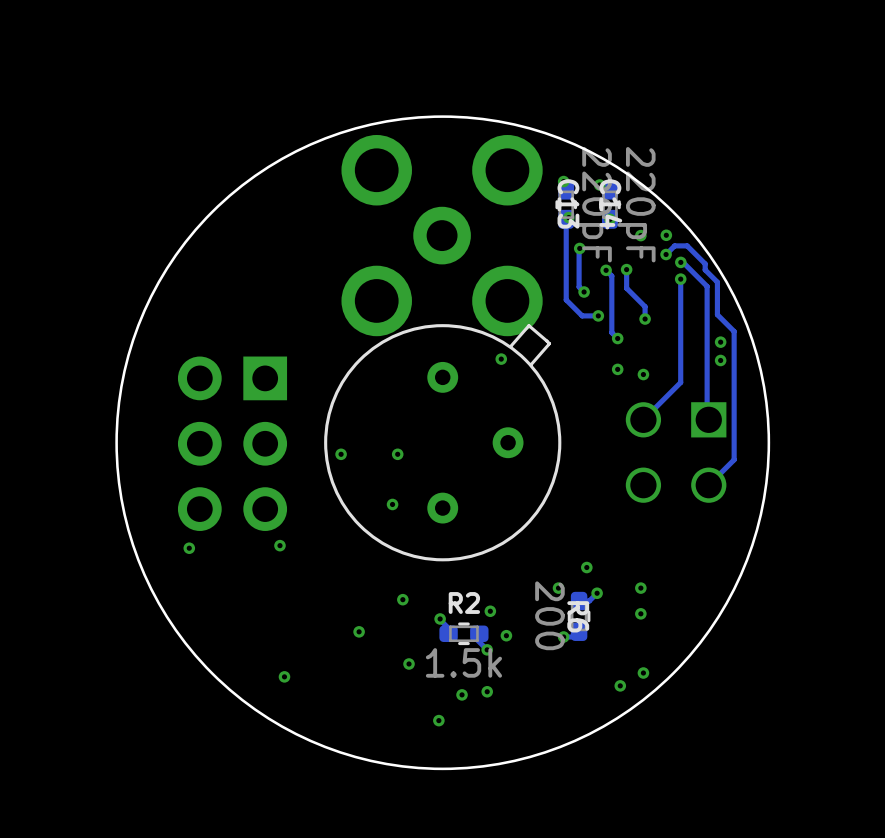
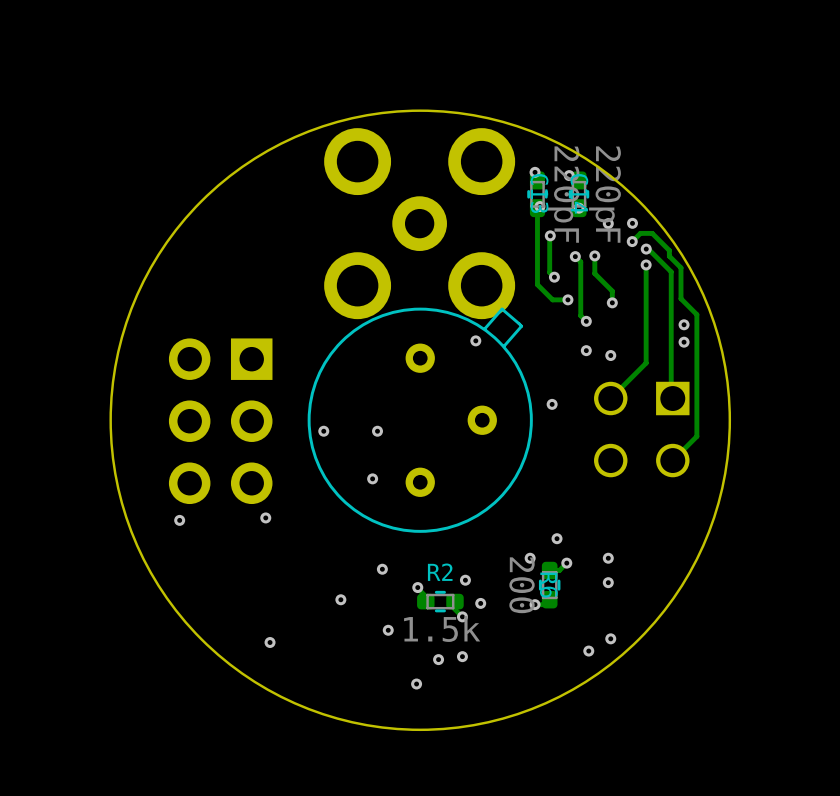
via: none -> (552, 404)

